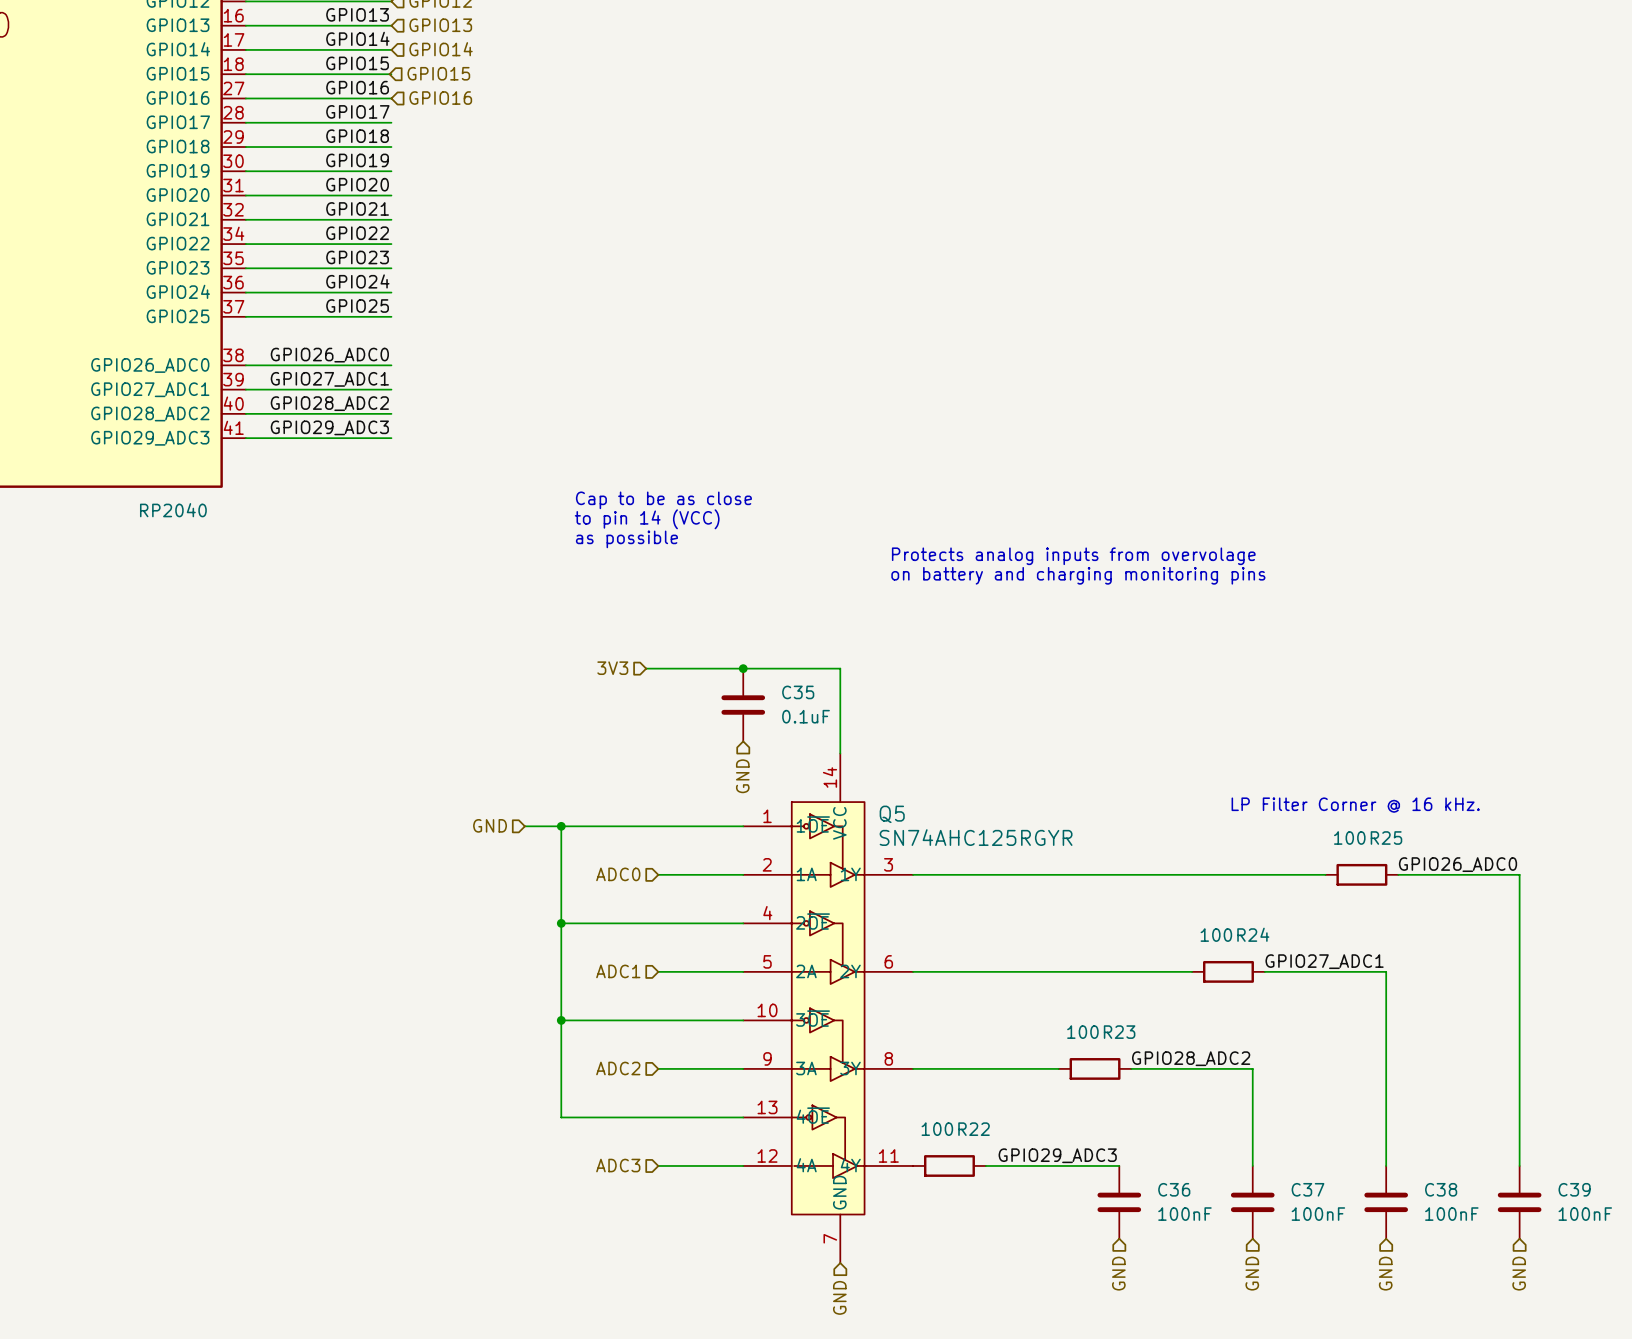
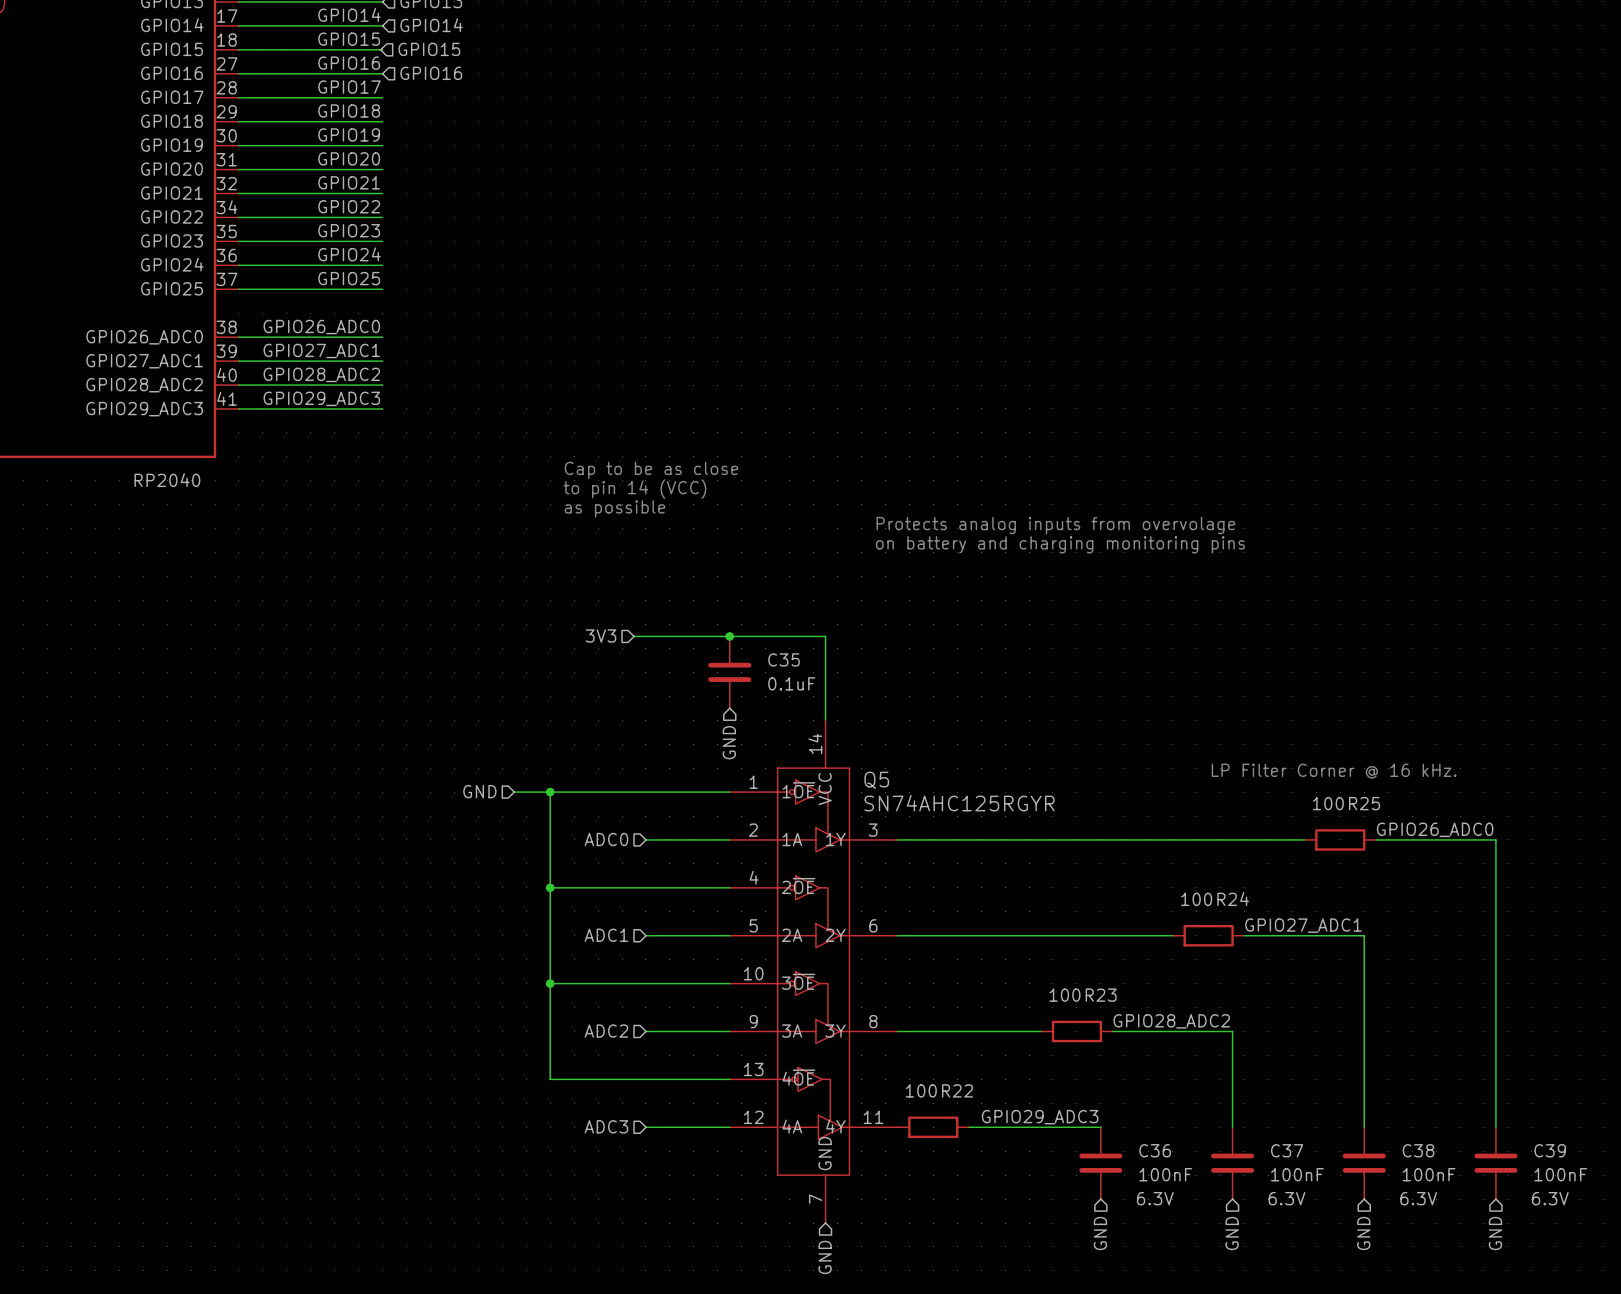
C36 text: none -> 6.3V (1155, 1198)
C37 text: none -> 6.3V (1287, 1198)
C38 text: none -> 6.3V (1418, 1198)
C39 text: none -> 6.3V (1550, 1198)

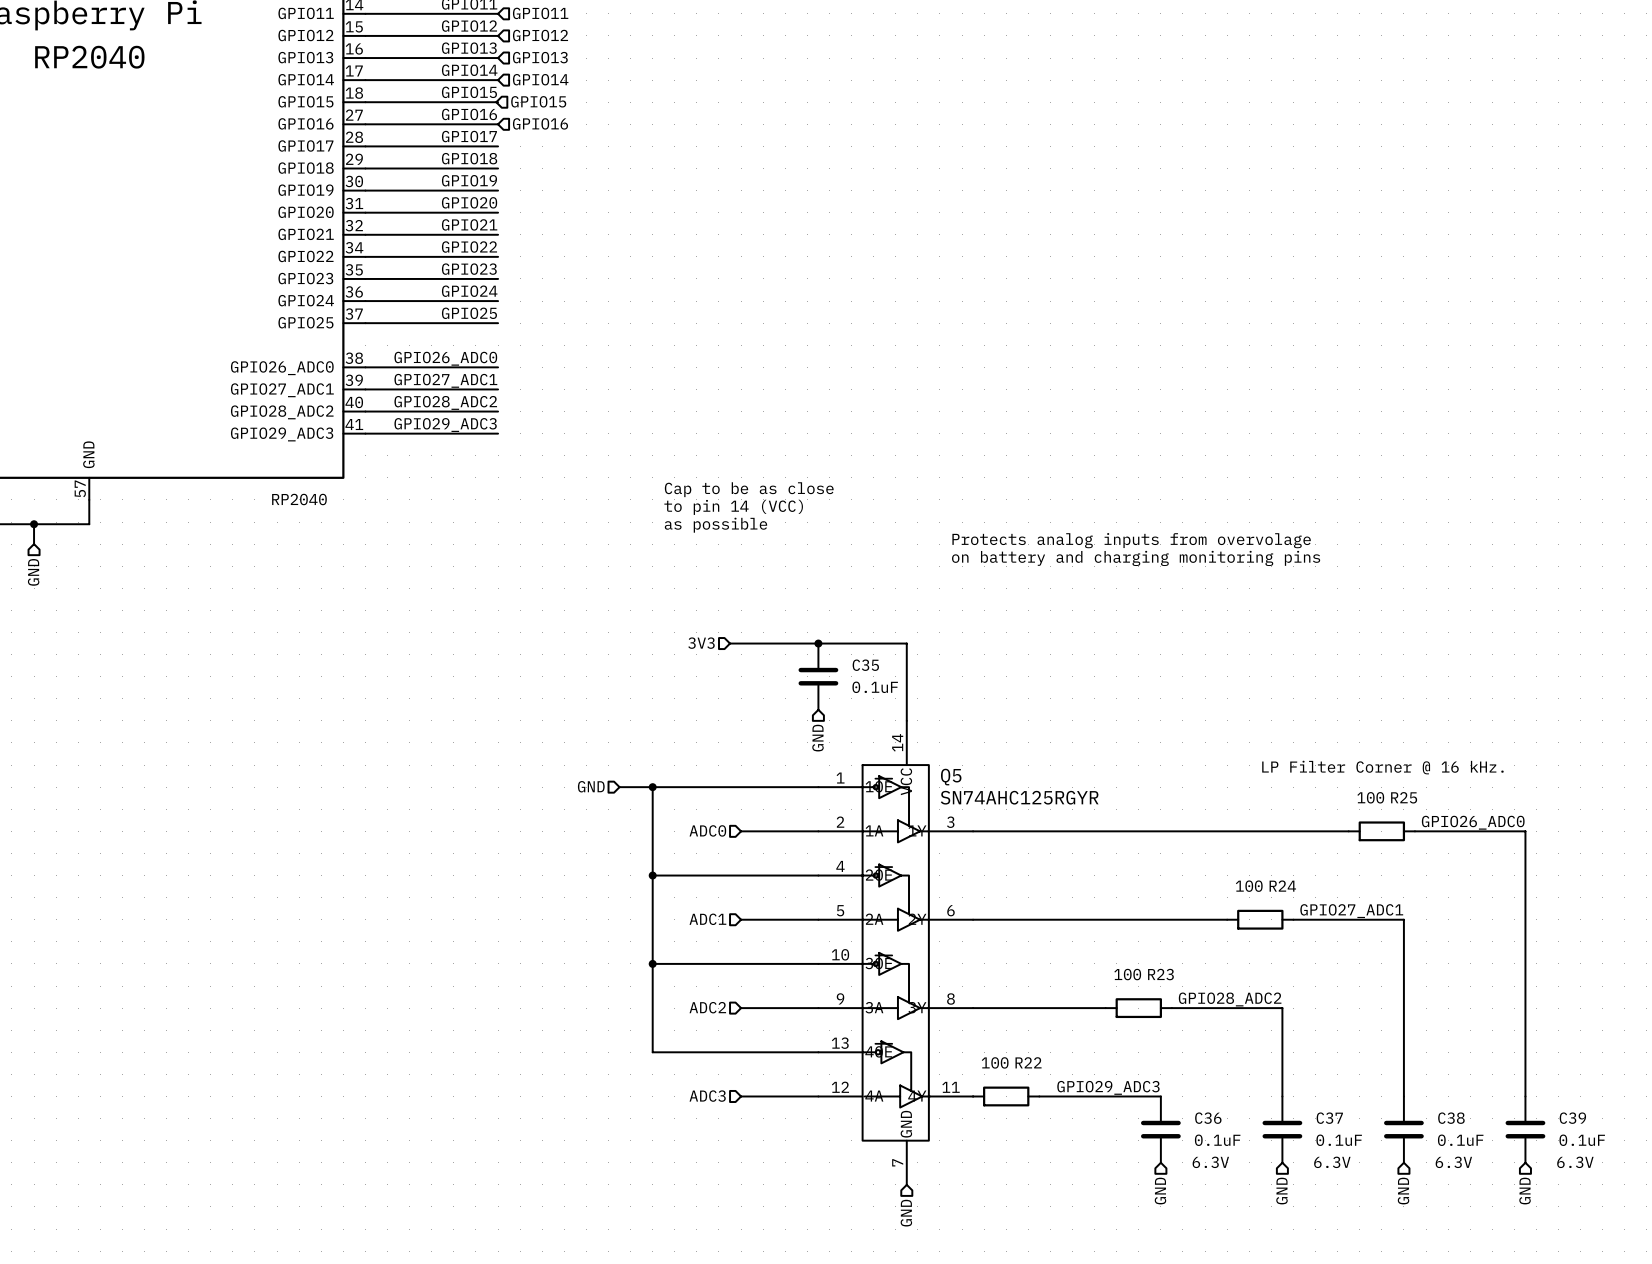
C36 value: 100nF (1165, 1174) -> 0.1uF (1217, 1140)
C37 value: 100nF (1297, 1174) -> 0.1uF (1339, 1140)
C38 value: 100nF (1429, 1174) -> 0.1uF (1460, 1140)
C39 value: 100nF (1560, 1174) -> 0.1uF (1582, 1140)

